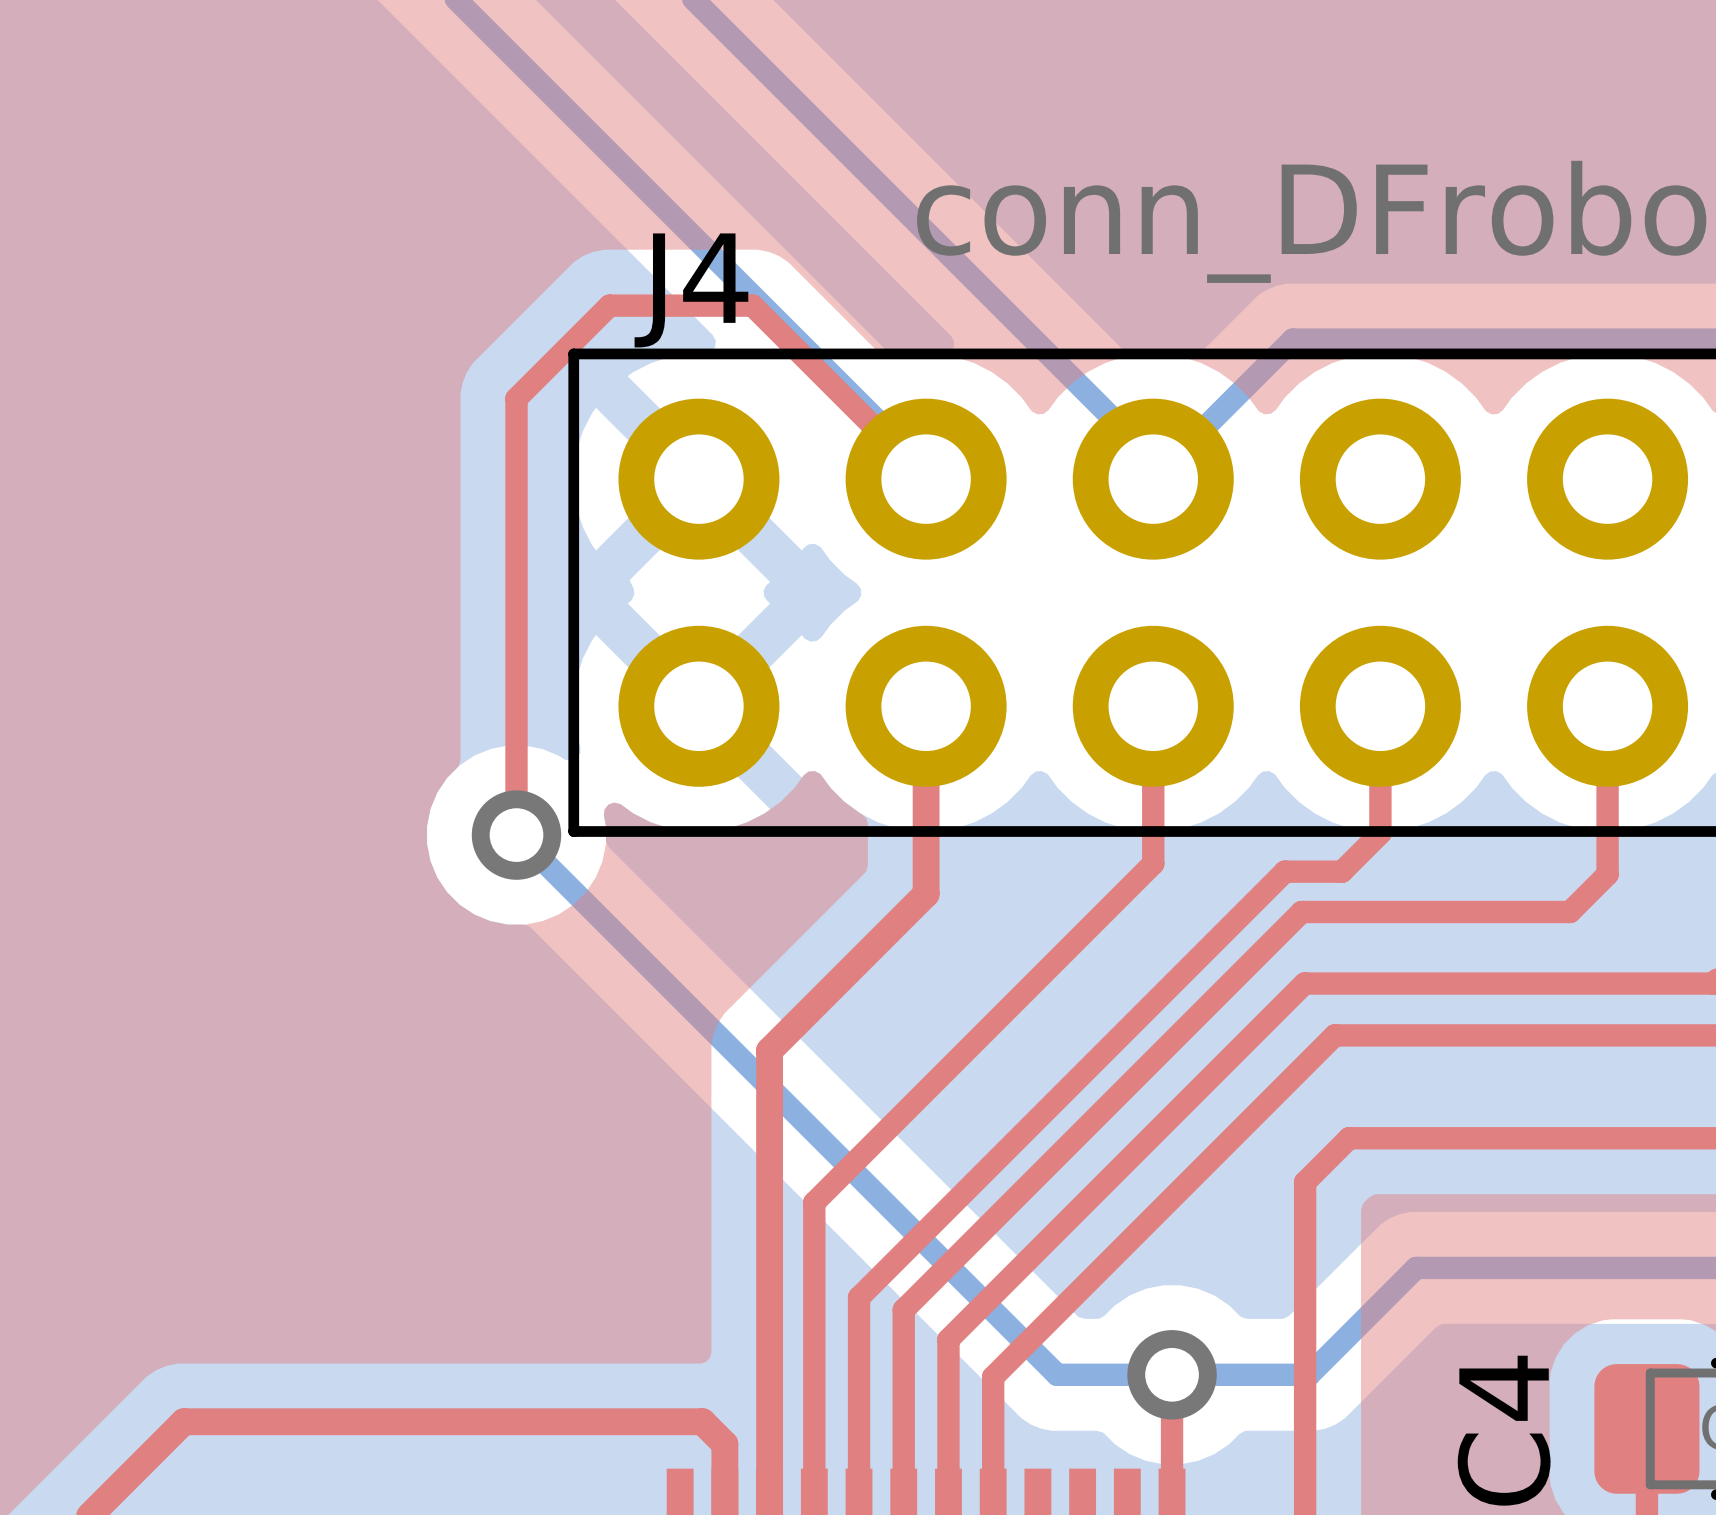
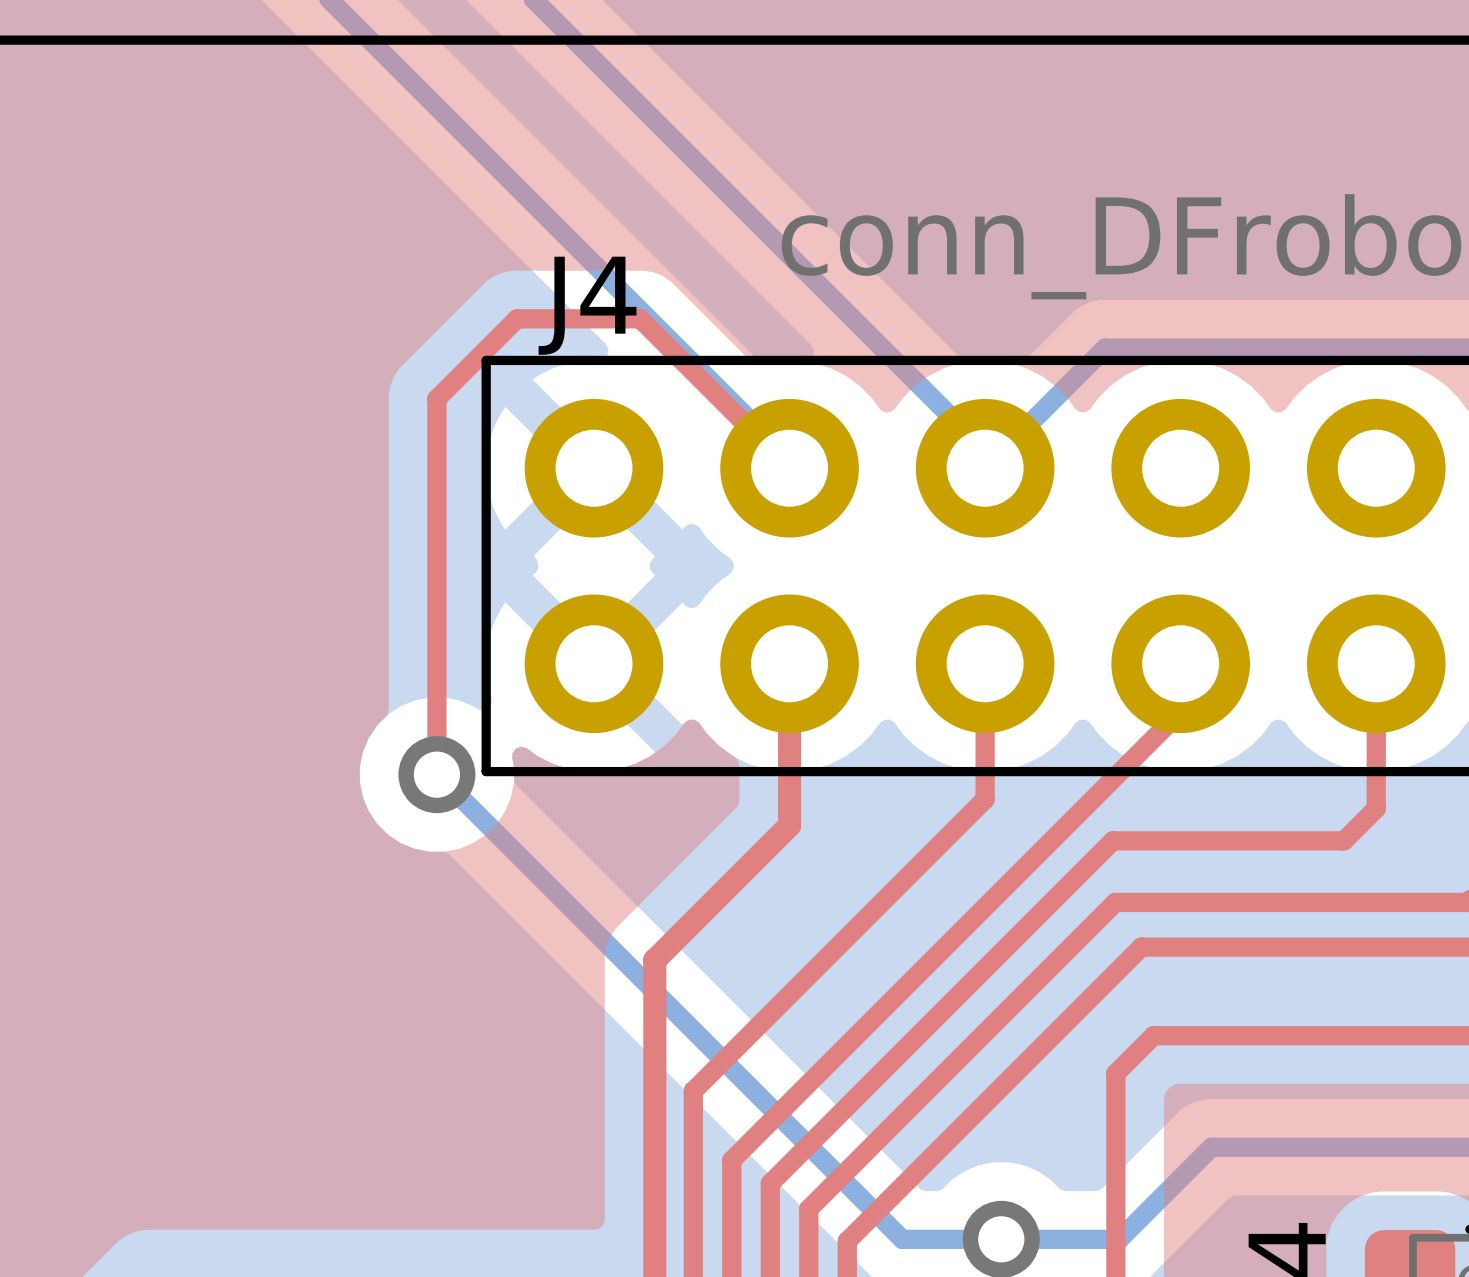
top track: (1380, 761) (1380, 833) (1342, 871) (1285, 871) (859, 1297) -> (1180, 711) (731, 1160) (731, 1172)

